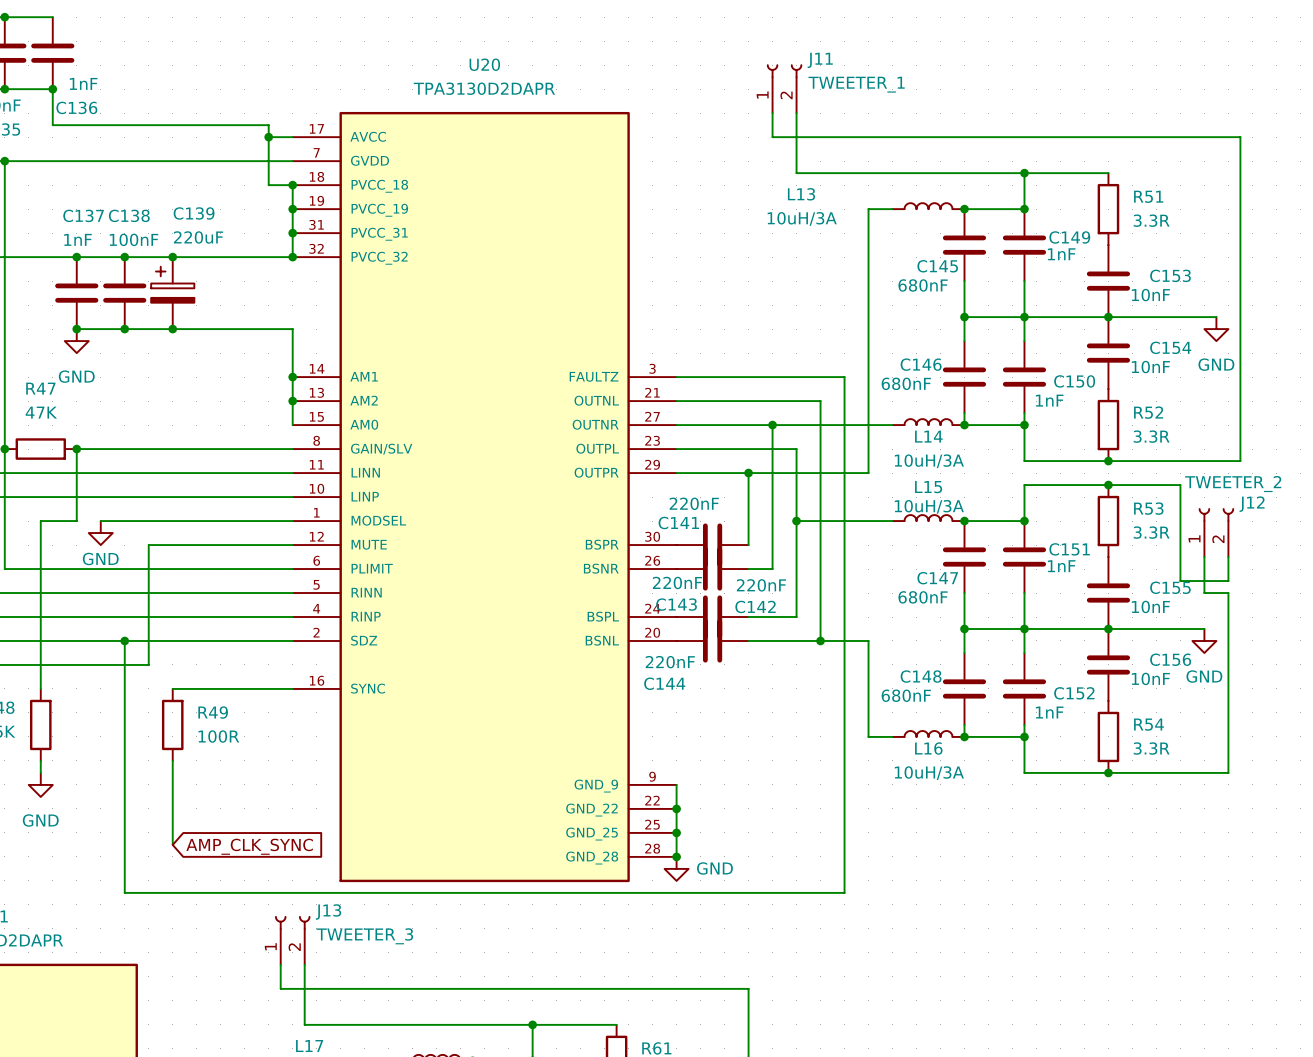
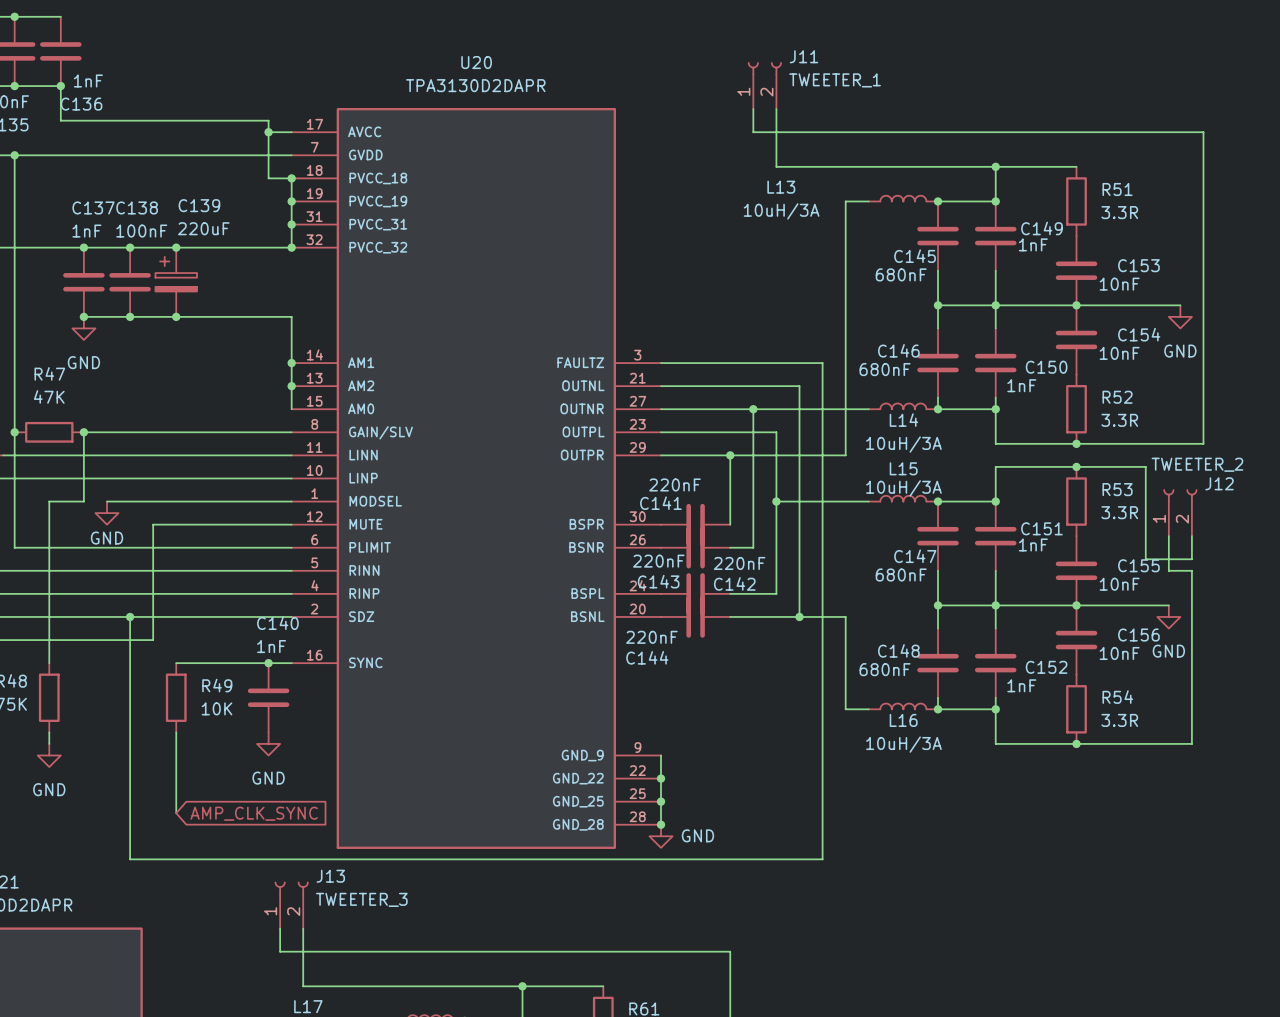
junction: none -> (268, 663)
C140: none -> 1nF (268, 697)
R49 value: 100R (218, 736) -> 10K (217, 708)
power symbol: none -> GND (268, 743)

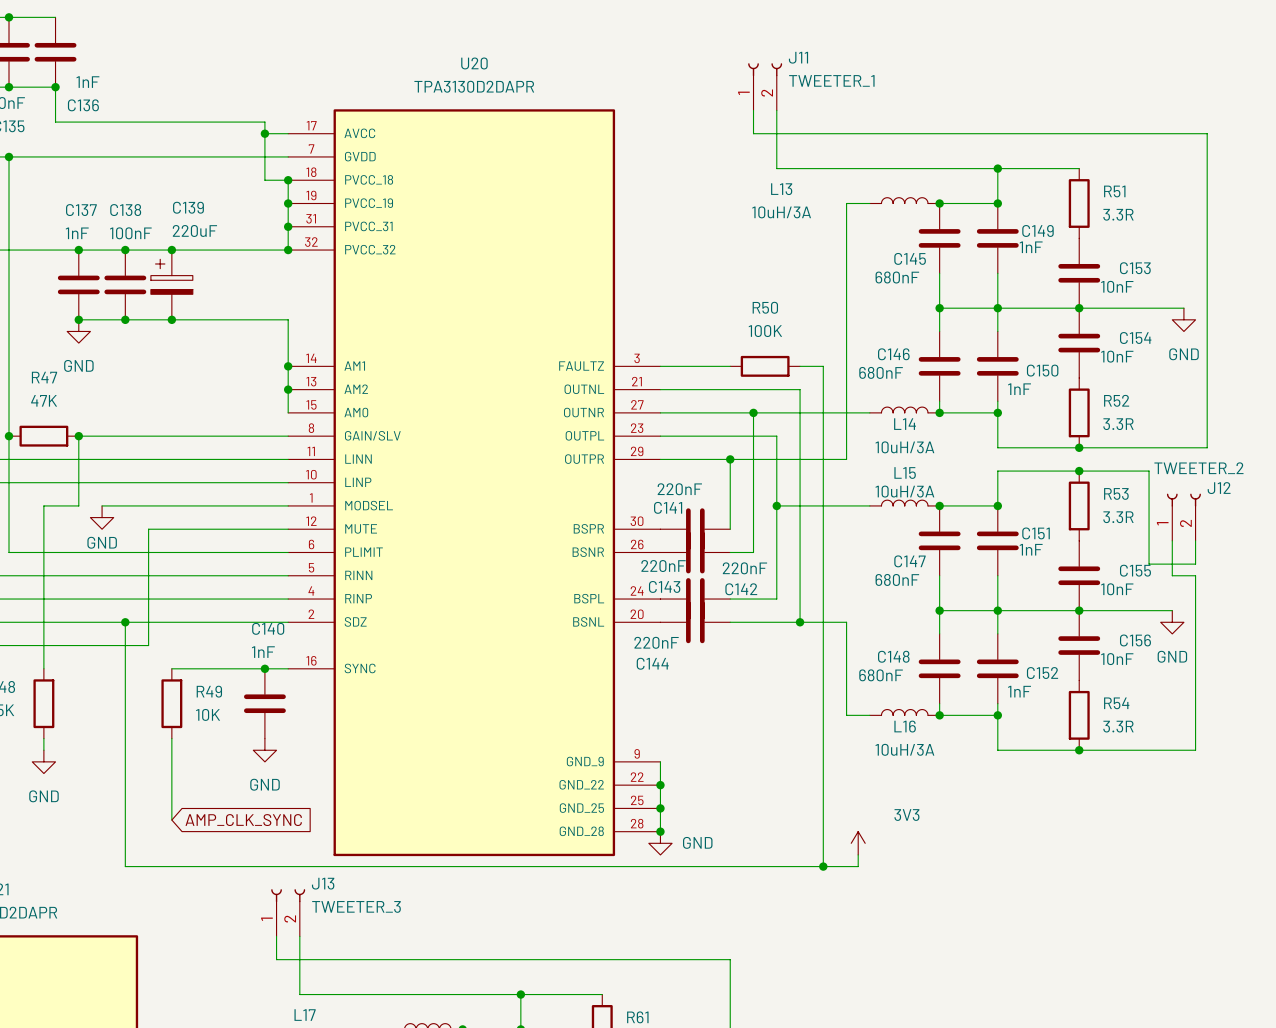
wire: (730, 363) (799, 363) -> none
R50: none -> 100K (765, 366)
power symbol: none -> 3V3 (858, 843)
wire: none -> (858, 854) (858, 866) (823, 866)
junction: none -> (823, 866)

